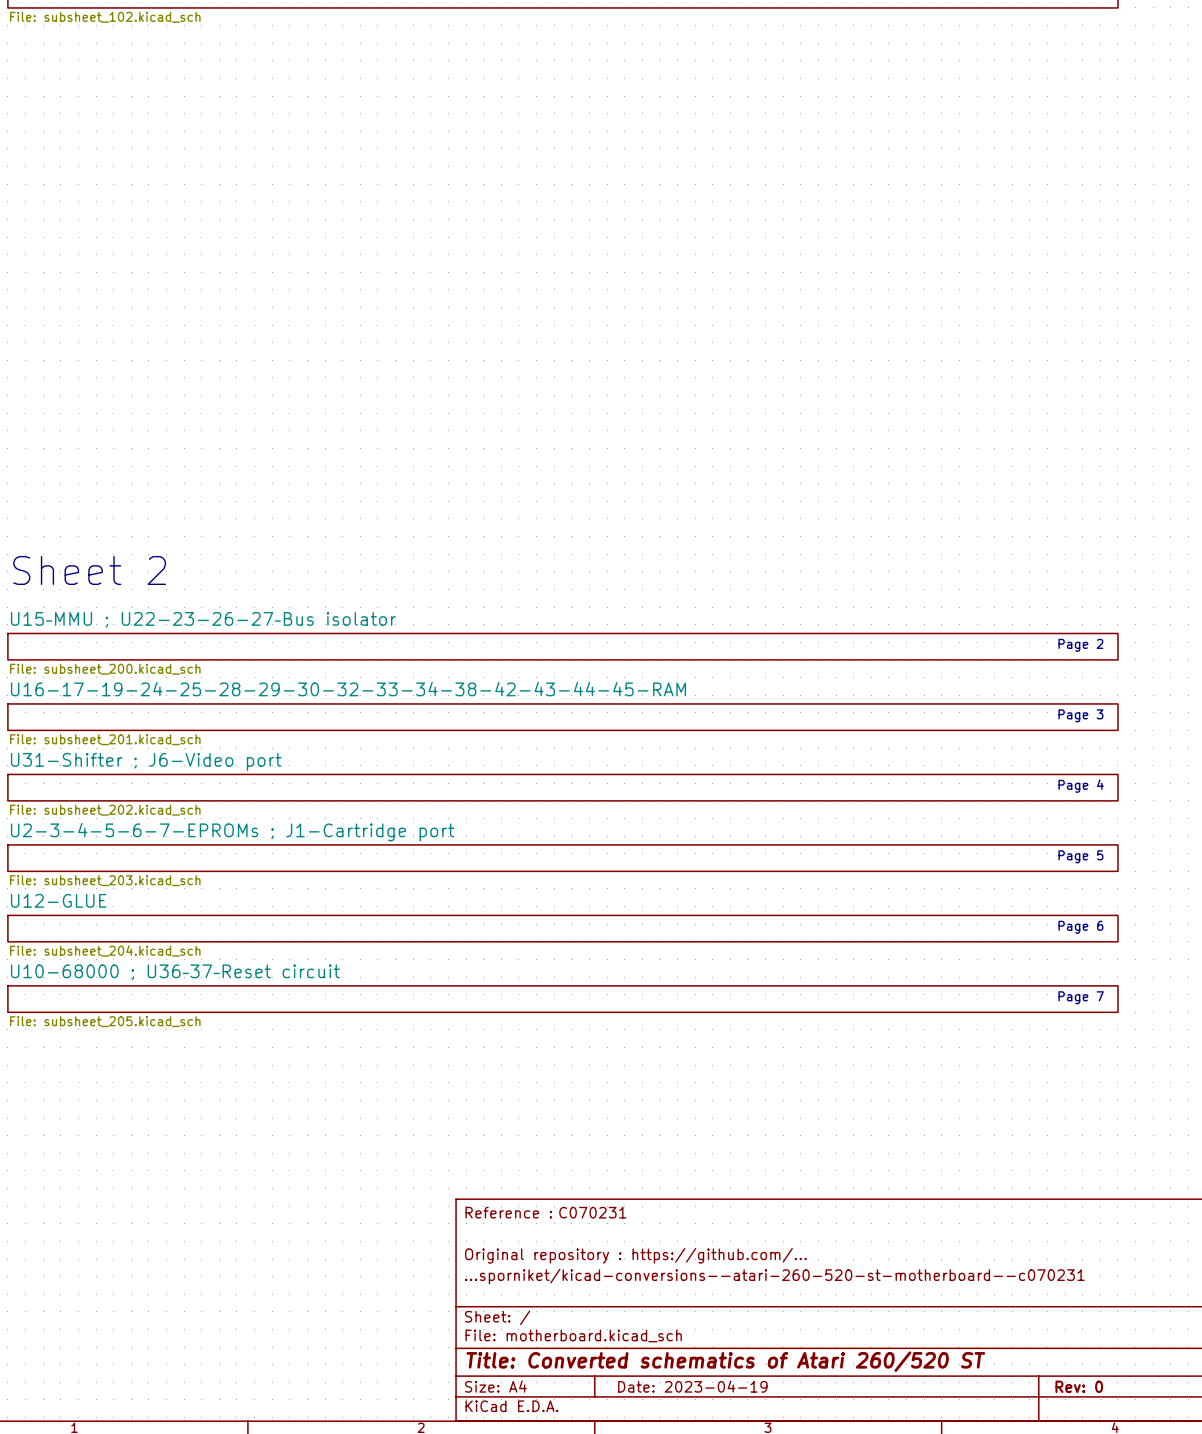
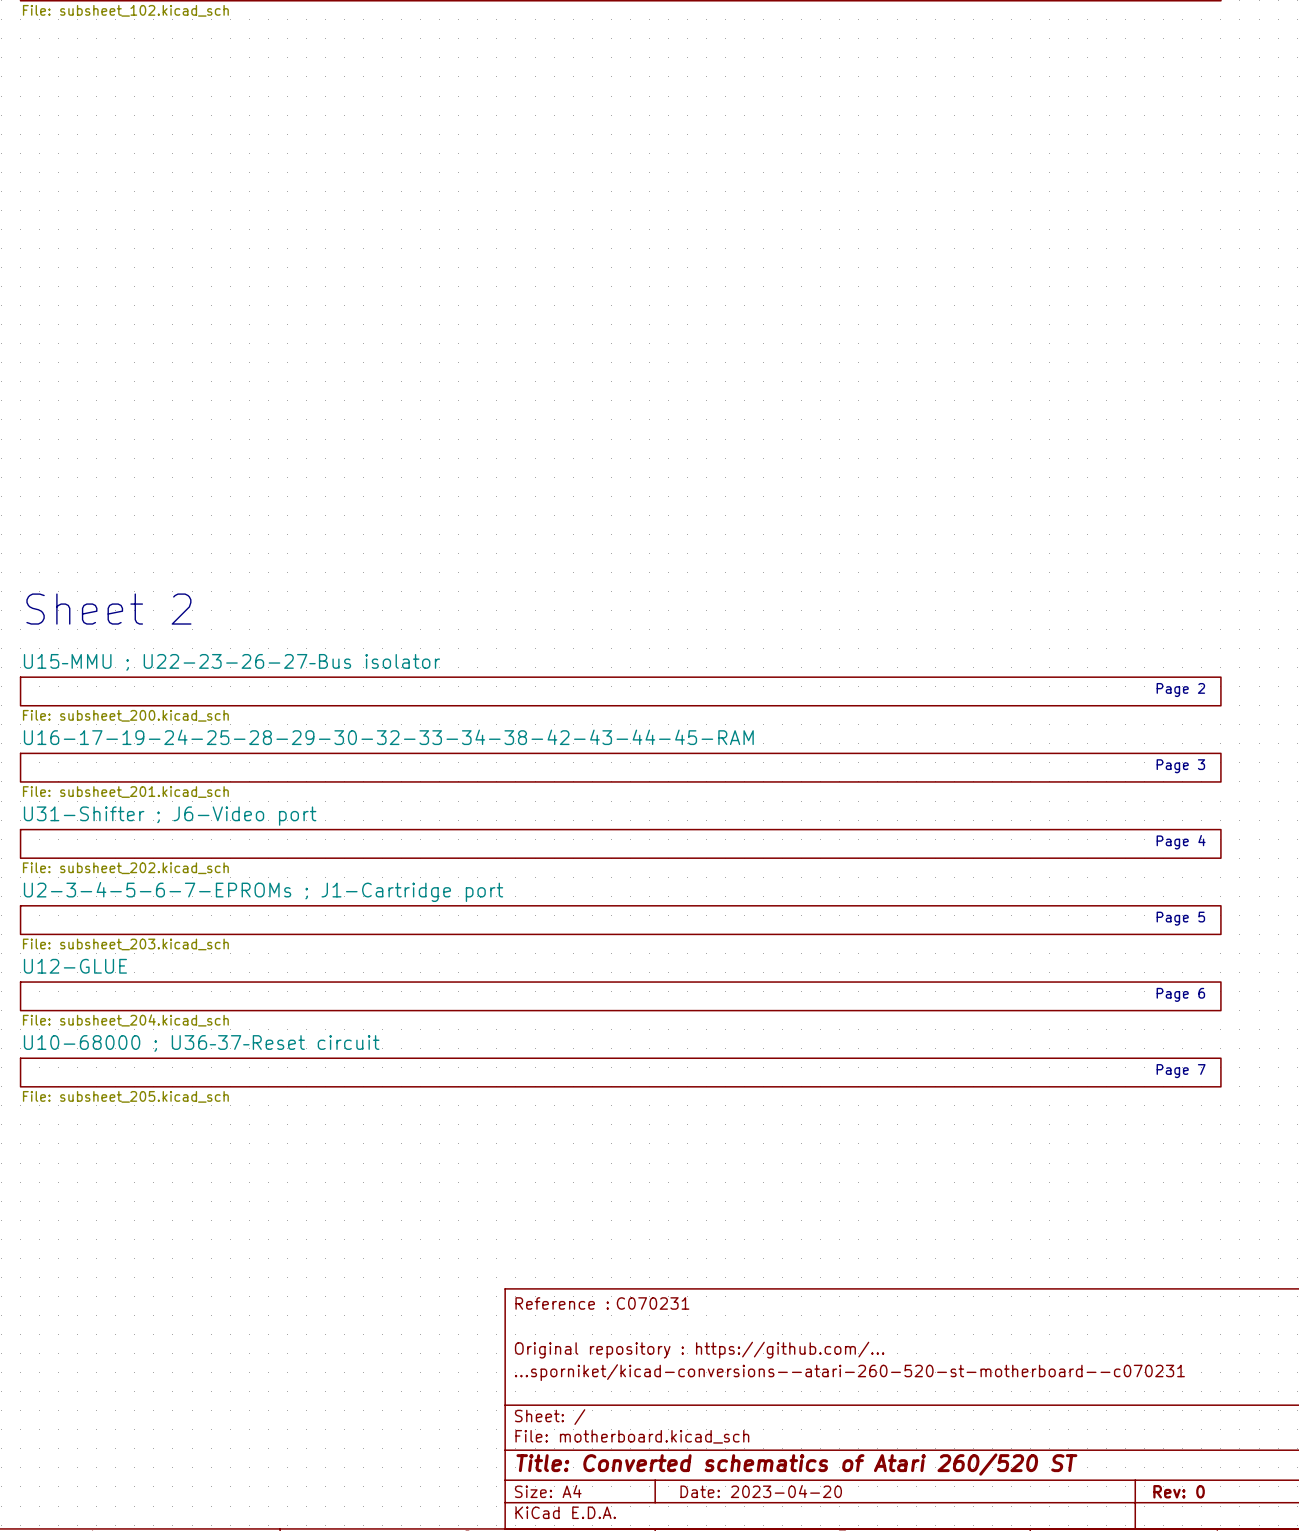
title block: Date: 2023-04-19 (692, 1386) -> Date: 2023-04-20 (761, 1491)

